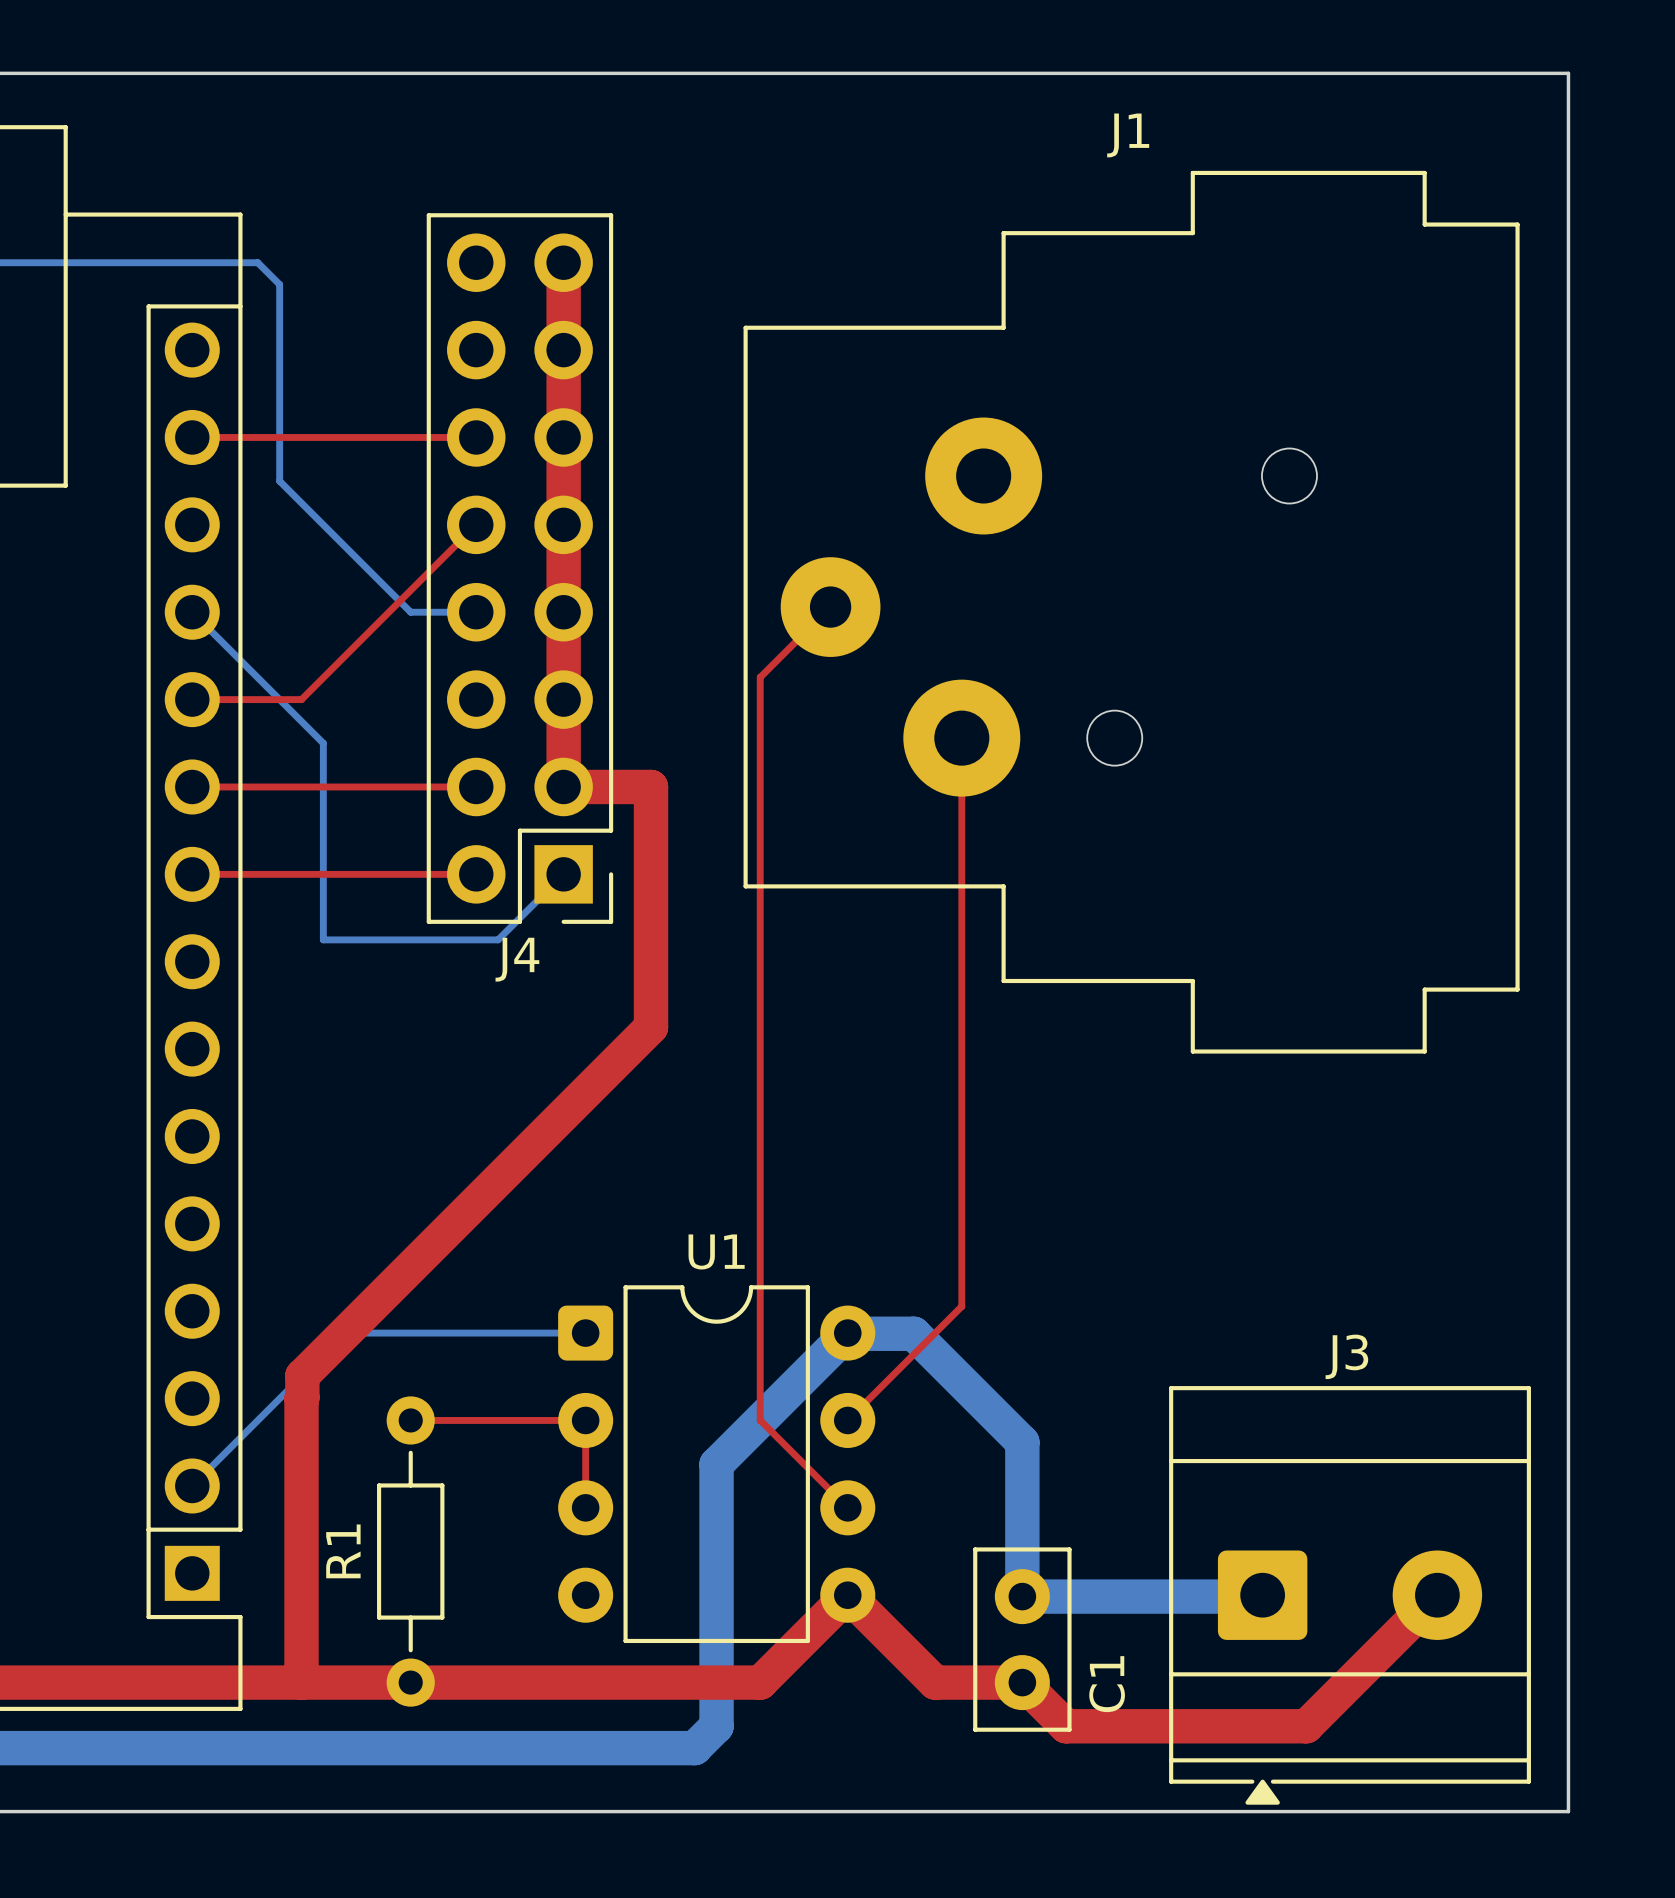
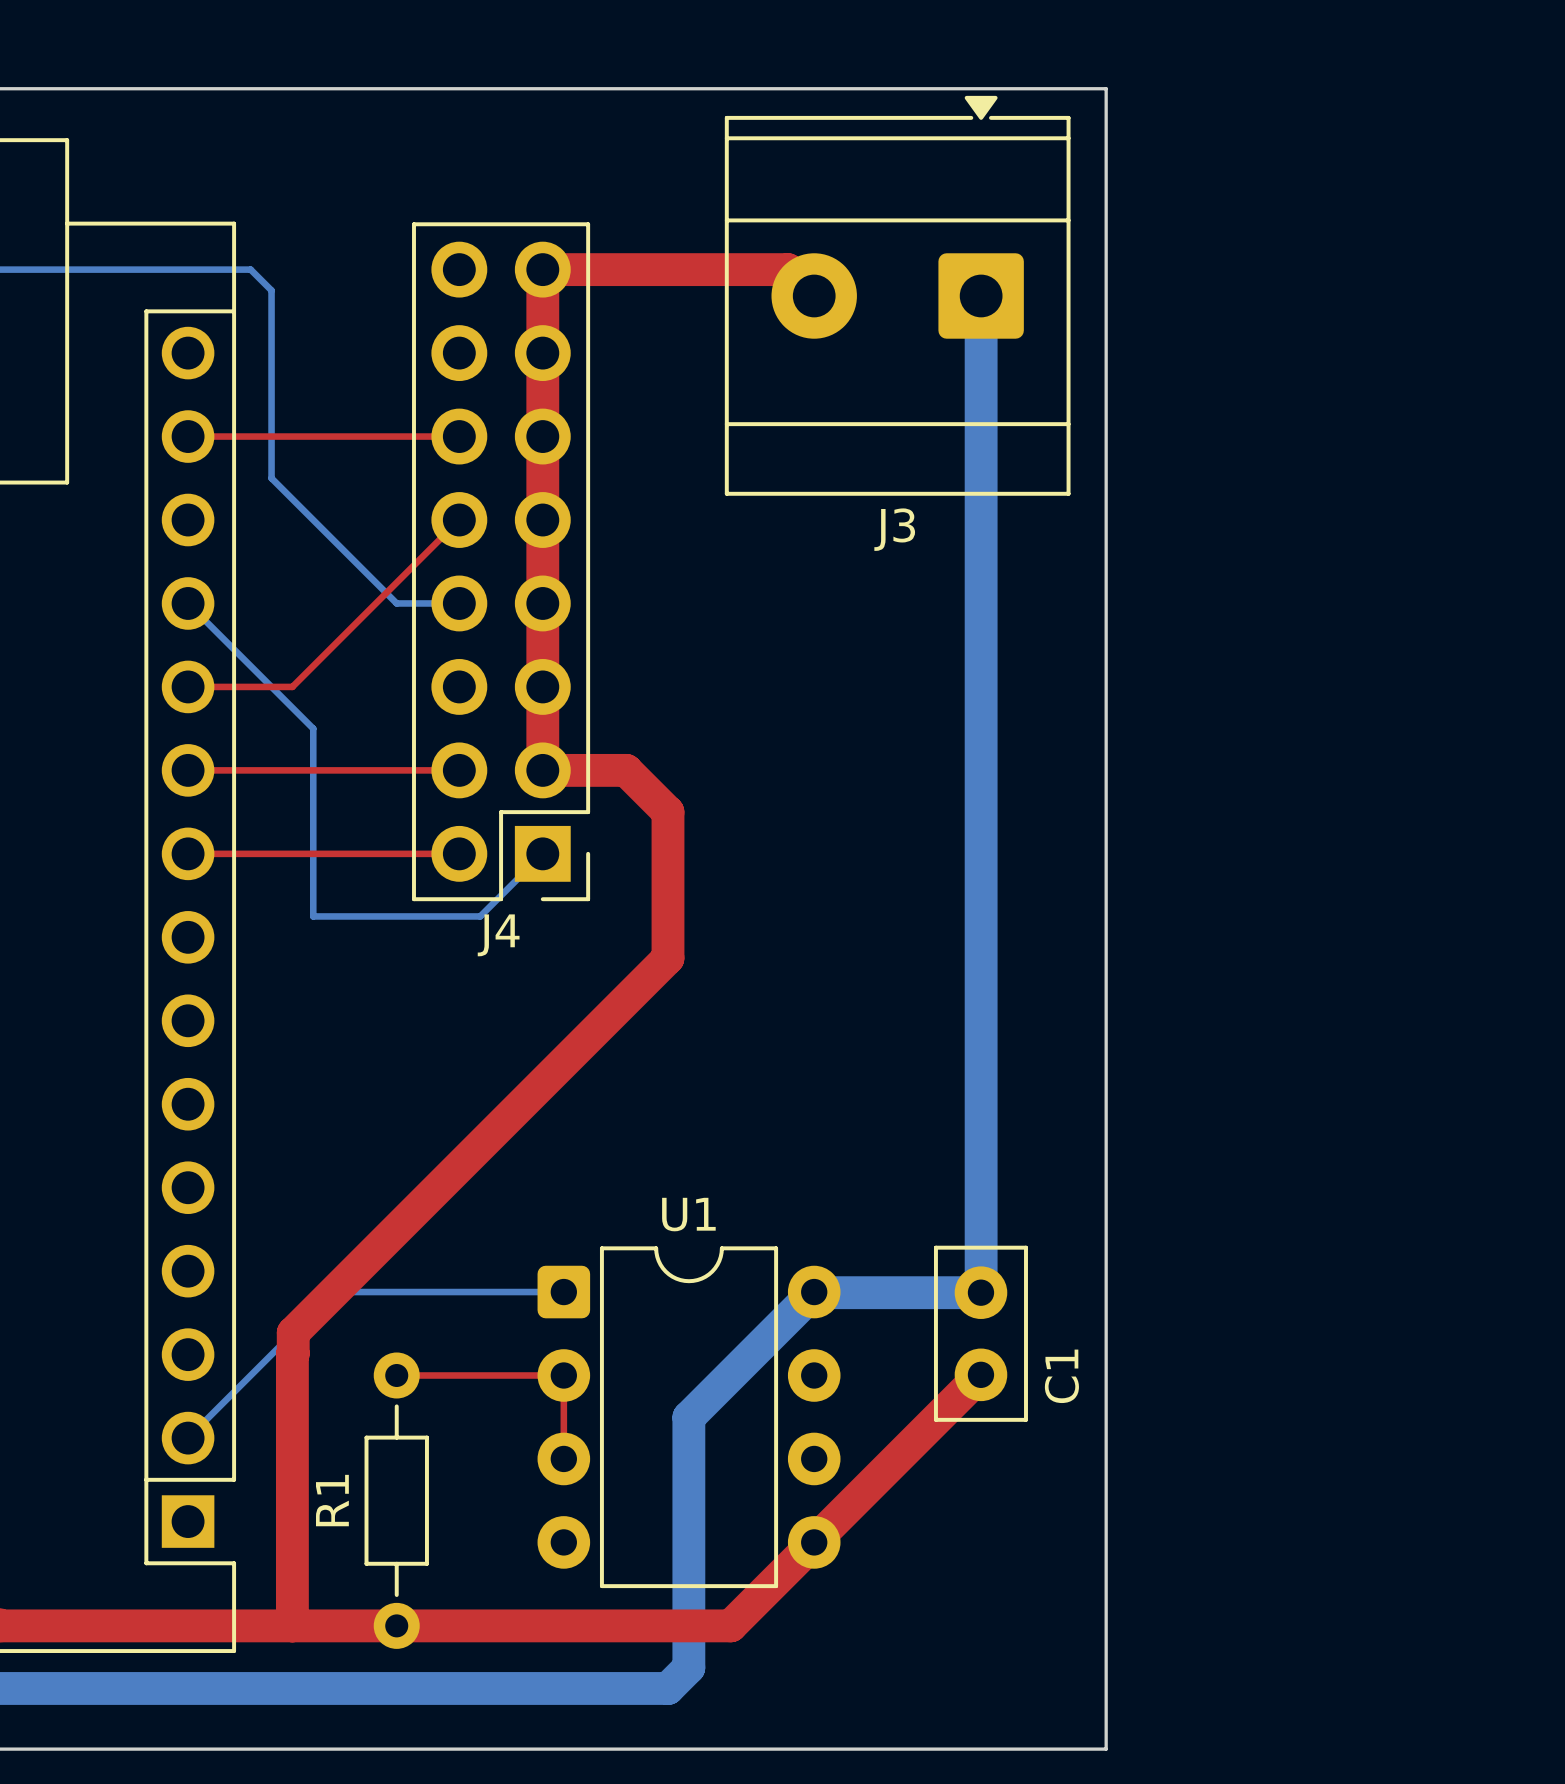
board edge: (1153, 73) (1568, 73) (1568, 1811) (1153, 1811) -> (1106, 88) (1106, 1749)
top track: none -> (542, 269) (787, 269) (814, 295)
bottom track: none -> (981, 295) (981, 1292)
top track: (830, 607) (760, 677) (760, 1420) (847, 1507) -> none
J1: (1131, 612) -> none
top track: (961, 738) (961, 1306) (847, 1420) -> none
top track: (651, 786) (651, 1027) -> (626, 770) (667, 812) (667, 958) (626, 999)
bottom track: (913, 1333) (1022, 1442) (1022, 1596) (1262, 1595) -> (877, 1292) (960, 1292)
top track: (847, 1595) (935, 1682) (1022, 1682) (1066, 1726) (1306, 1726) (1437, 1595) -> (814, 1542) (980, 1374)
J3 rotation: 0° (1350, 1595) -> 180° (897, 295)
J3 position: (1350, 1595) -> (897, 295)
C1 position: (1022, 1639) -> (980, 1333)

